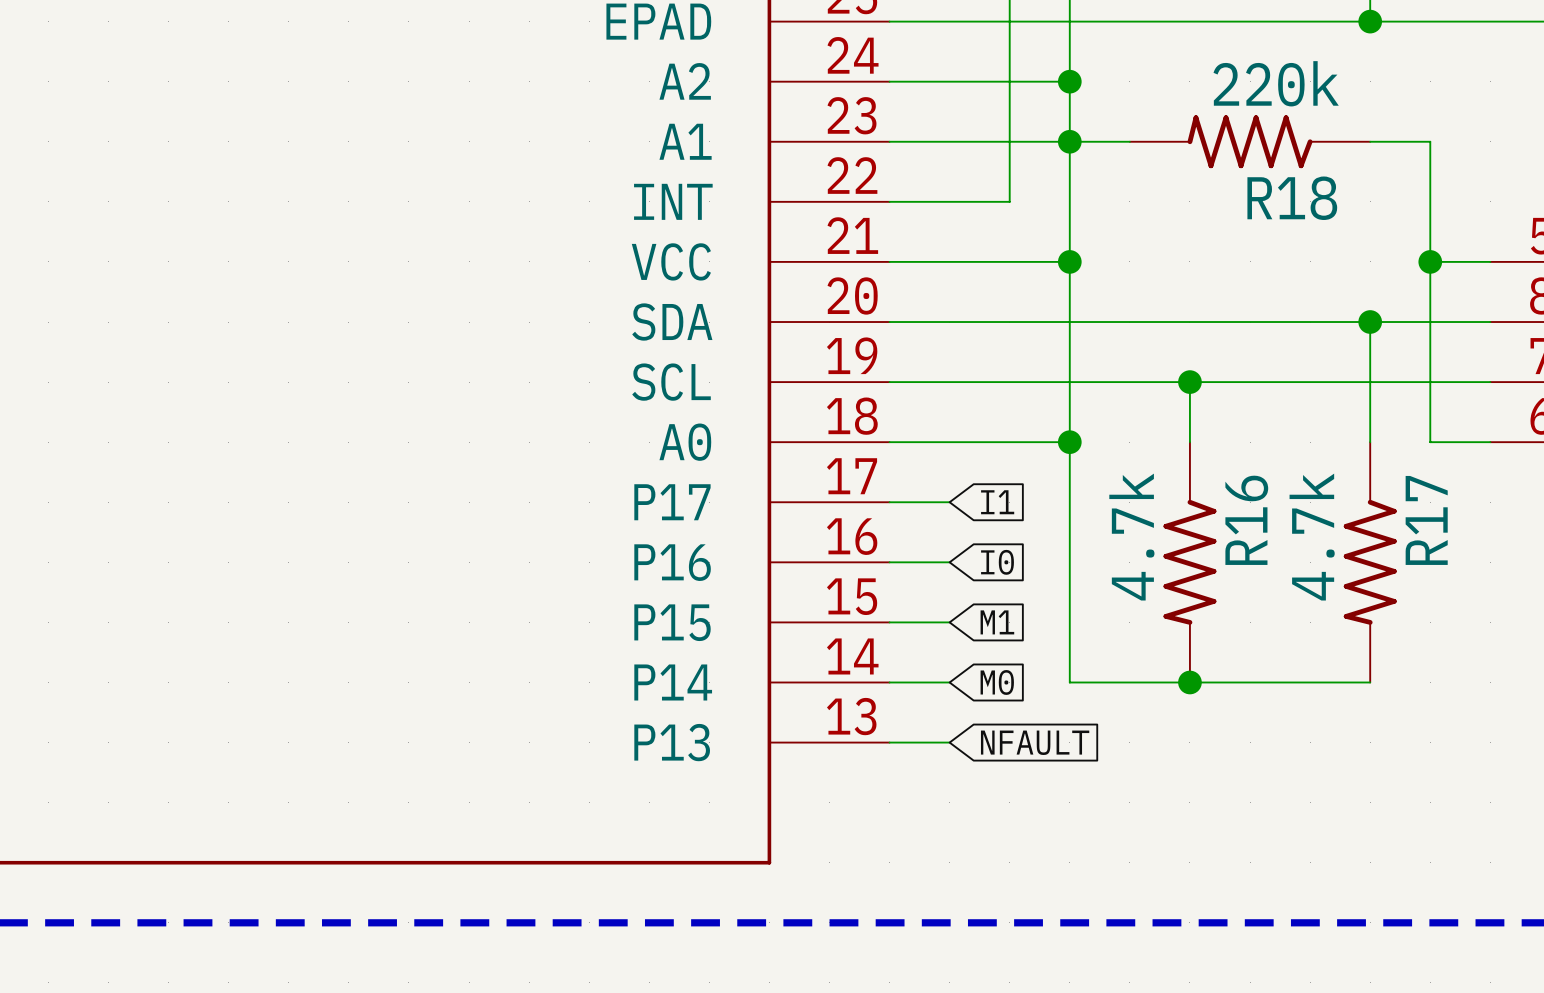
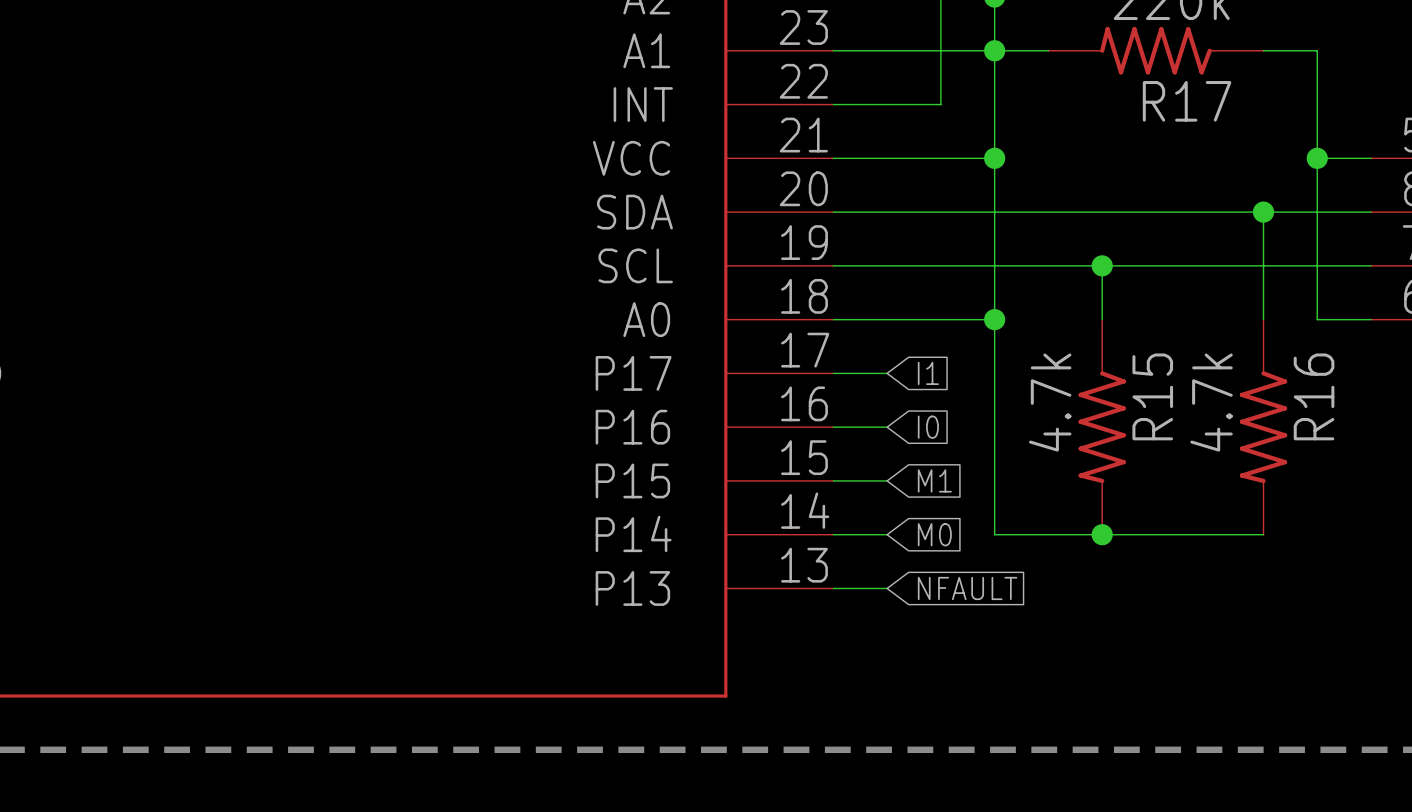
R18 name: R18 (1292, 198) -> R17 (1187, 101)
R16 name: R16 (1246, 520) -> R15 (1152, 396)
R17 name: R17 (1426, 520) -> R16 (1314, 396)

